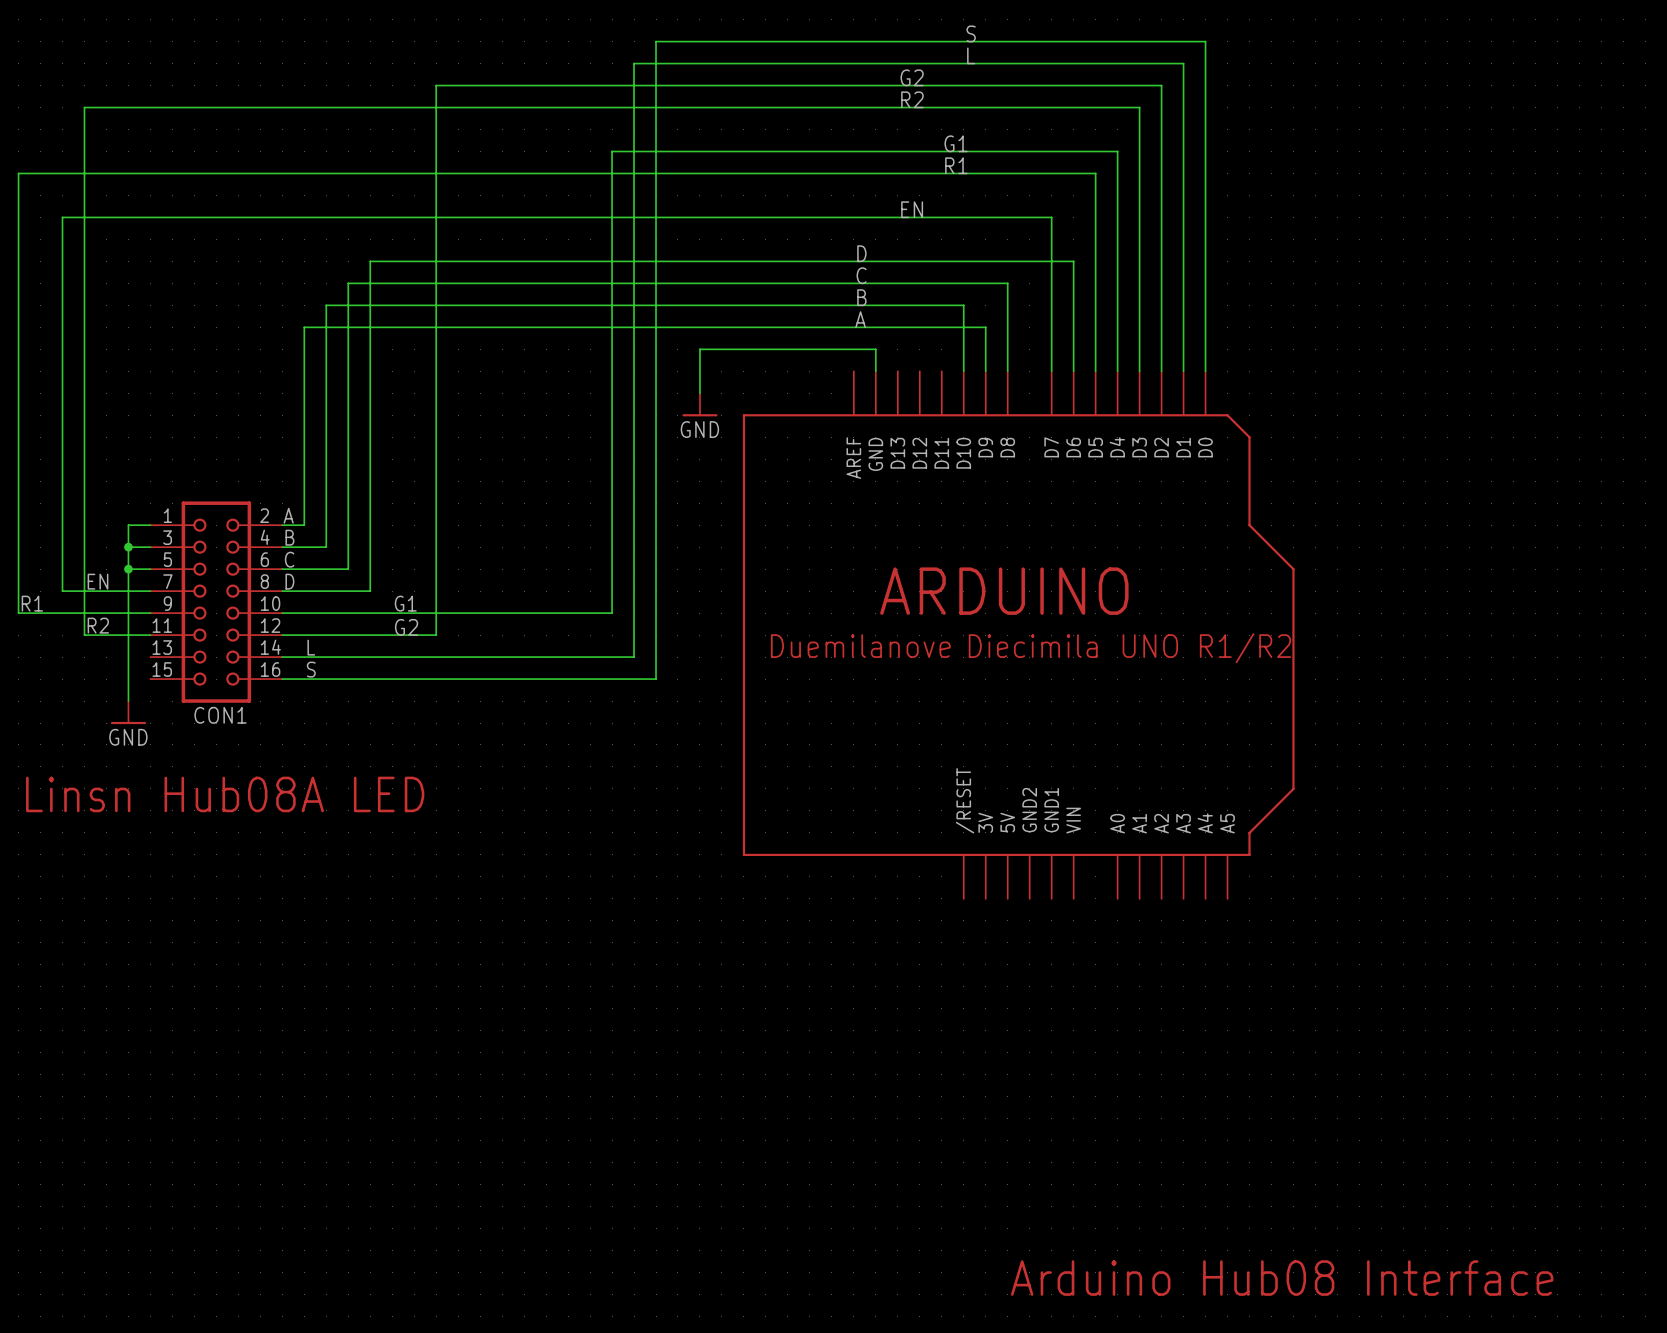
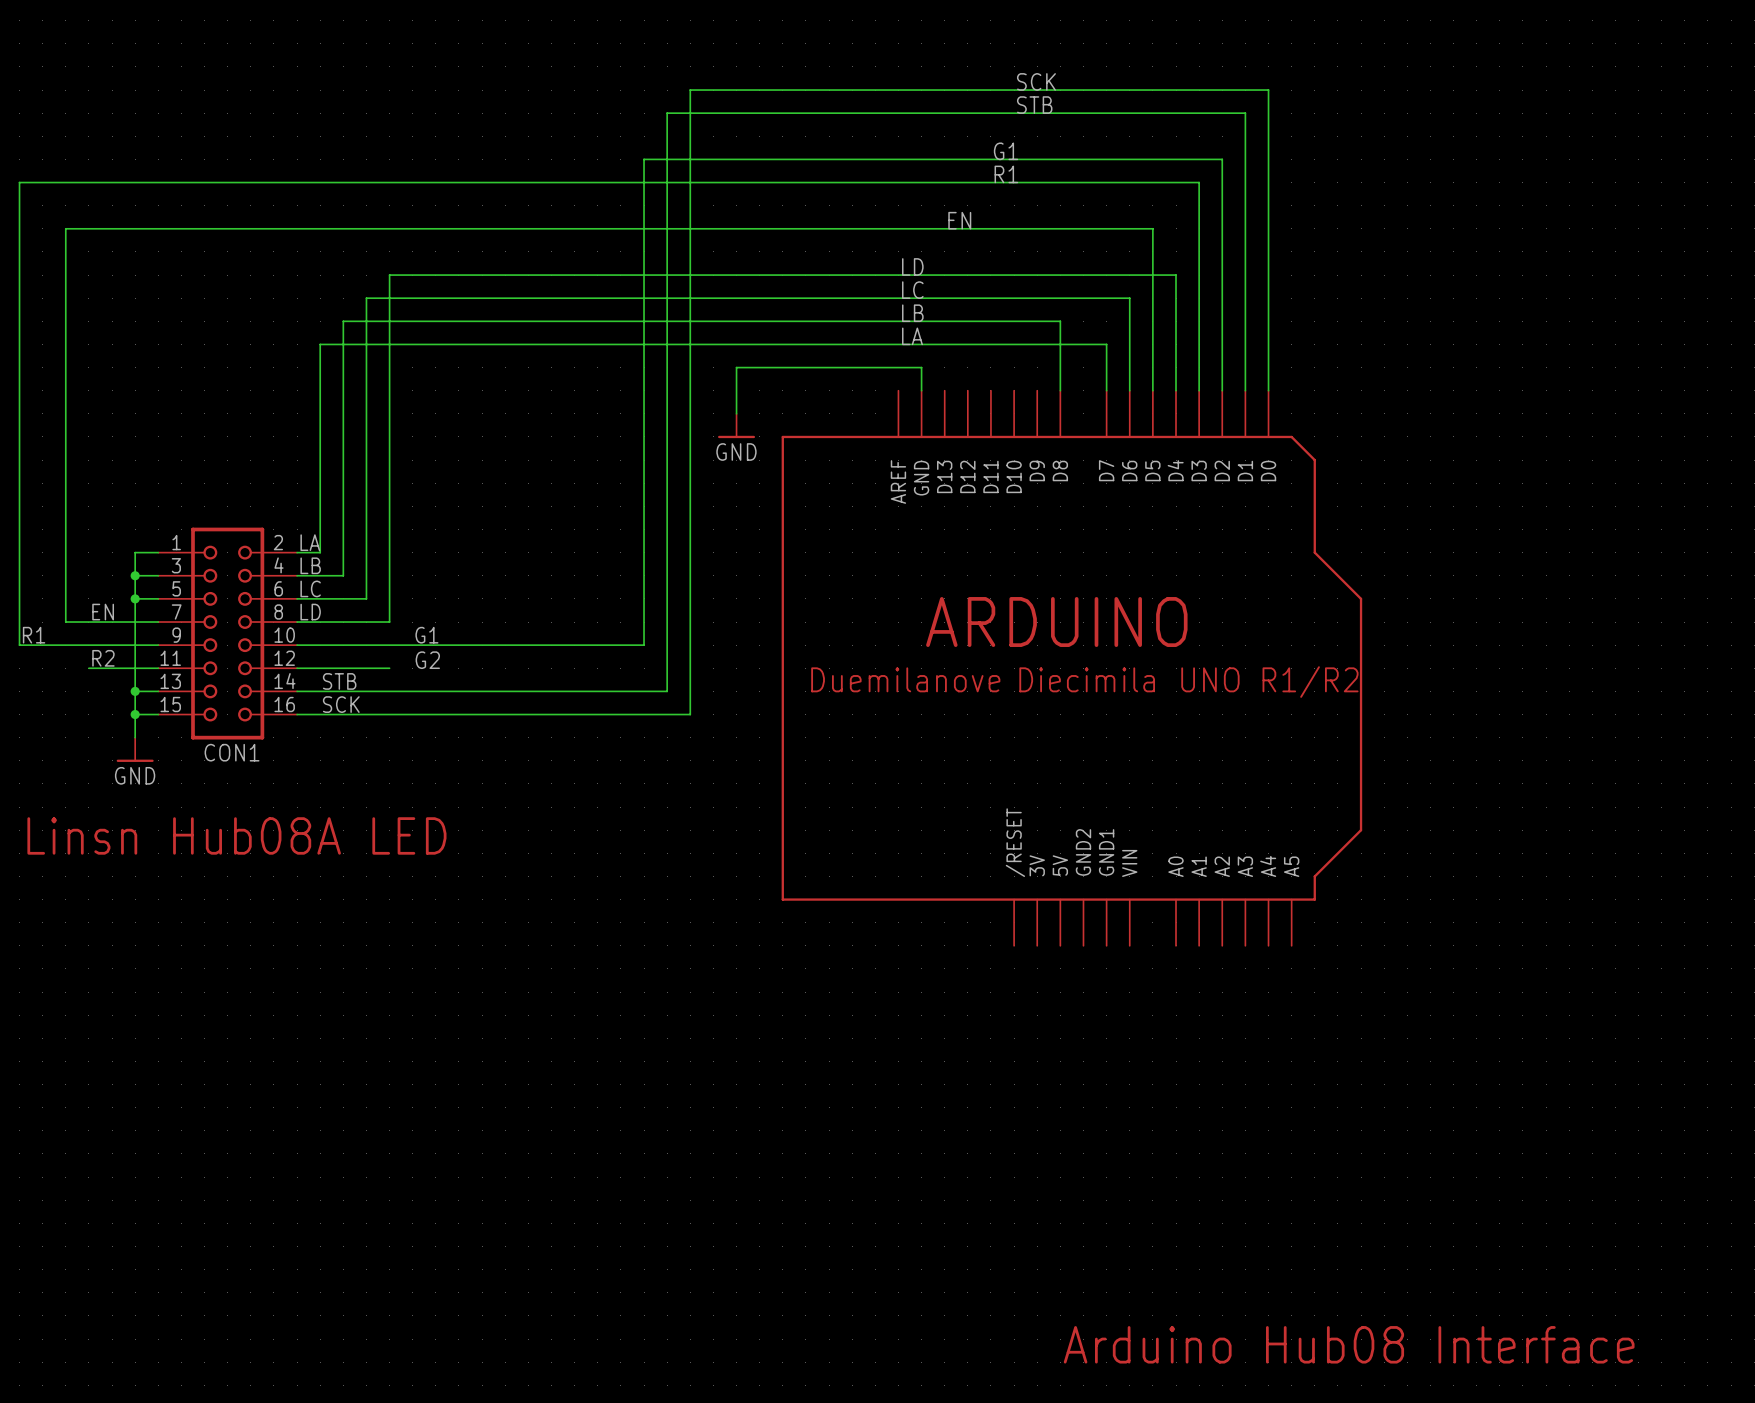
label: S (971, 33) -> none
label: L (971, 55) -> none
label: G2 (912, 77) -> none
label: none -> SCK (1036, 81)
wire: (1161, 85) (1161, 151) -> (1176, 159) (1222, 159)
wire: (1205, 85) (1205, 41) (656, 41) (656, 85) (436, 85) (436, 635) (370, 635) -> (1268, 90) (1222, 90)
label: R2 (912, 99) -> none
label: none -> STB (1034, 105)
wire: (1139, 107) (1139, 173) -> (1199, 113) (1245, 113)
wire: (1183, 107) (1183, 63) (634, 63) (634, 107) (84, 107) (84, 635) -> none
wire: (1117, 151) (1117, 261) -> none
wire: (1095, 173) (1095, 217) -> (1106, 228) (1152, 228)
wire: none -> (1152, 182) (1199, 182)
wire: (1051, 217) (1051, 327) -> none
label: D (861, 253) -> LD (912, 266)
wire: (1073, 261) (1073, 283) -> (1129, 275) (1176, 275)
label: C (861, 275) -> LC (912, 290)
wire: (1007, 283) (1007, 305) -> (1014, 321) (1060, 321)
wire: none -> (1060, 298) (1129, 298)
label: B (861, 297) -> LB (912, 313)
wire: (963, 305) (963, 371) -> none
label: A (860, 319) -> LA (912, 336)
wire: (985, 327) (985, 371) -> (1037, 344) (1106, 344)
label: A (288, 515) -> LA (310, 542)
label: B (289, 537) -> LB (310, 565)
label: C (289, 559) -> LC (310, 588)
label: D (289, 581) -> LD (310, 612)
label: L (311, 647) -> STB (339, 681)
wire: none -> (135, 691) (158, 691)
junction: none -> (135, 691)
label: S (311, 669) -> SCK (341, 704)
wire: none -> (135, 714) (158, 714)
junction: none -> (135, 714)

